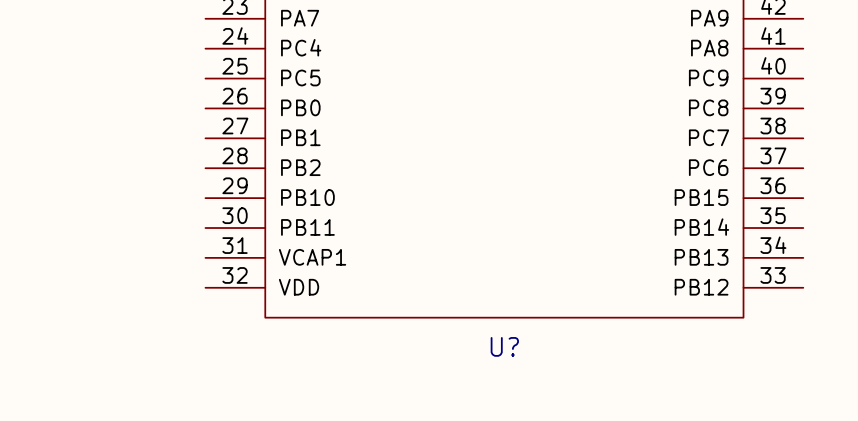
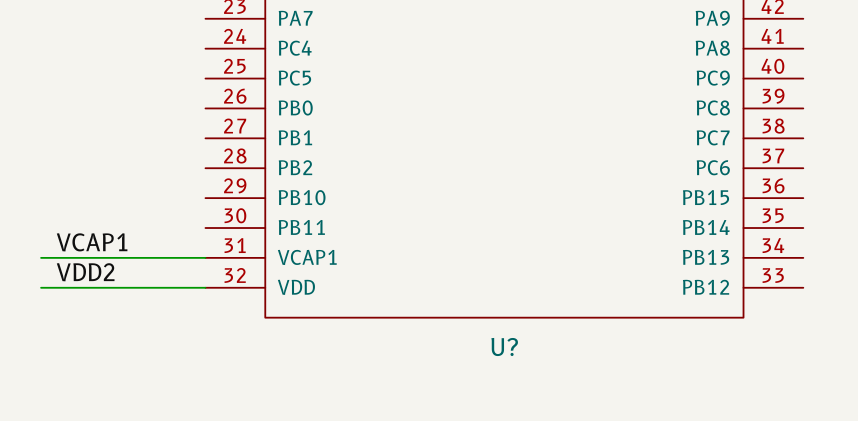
label: none -> VCAP1 (92, 242)
wire: none -> (41, 257) (205, 257)
label: none -> VDD2 (85, 272)
wire: none -> (41, 287) (205, 287)

